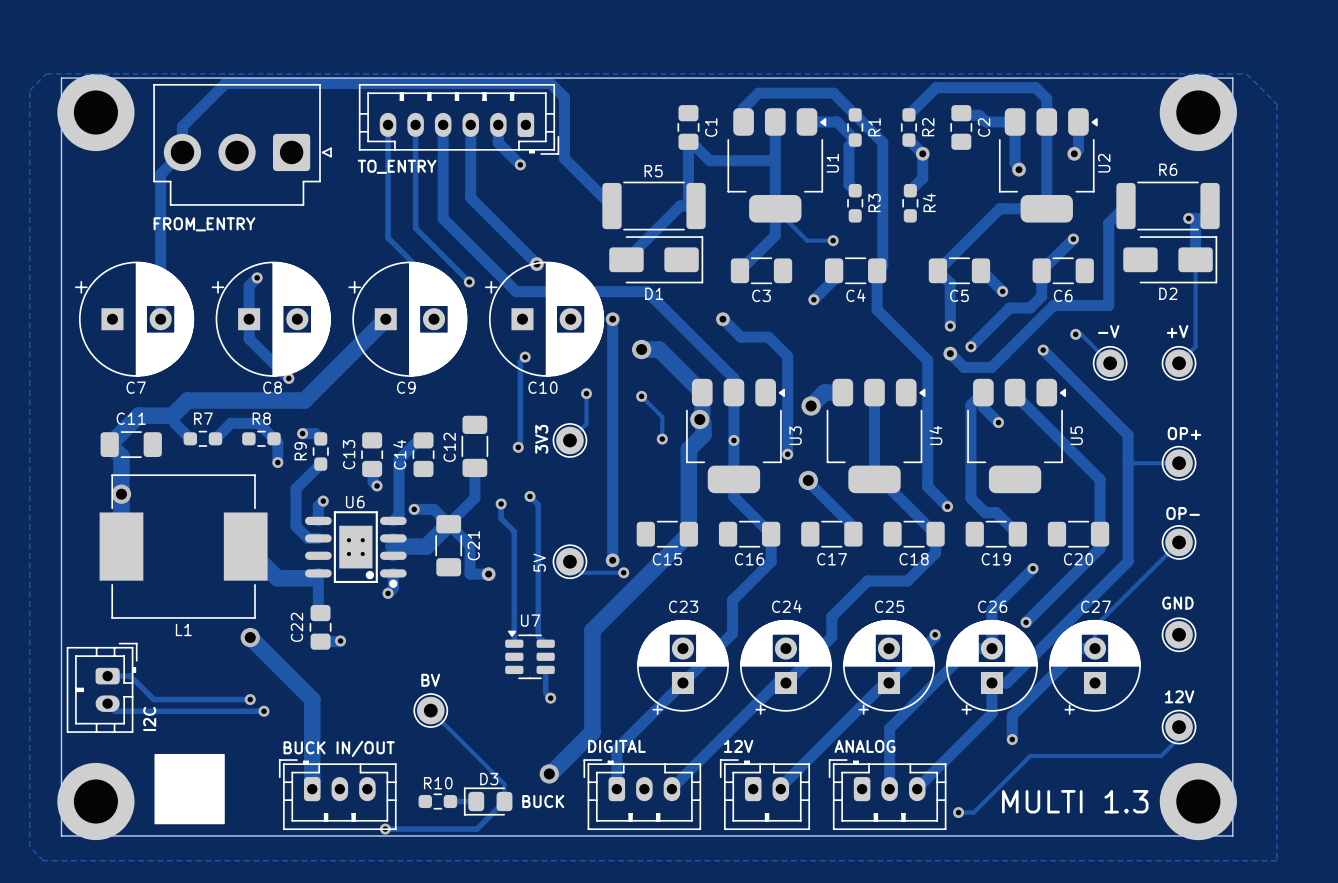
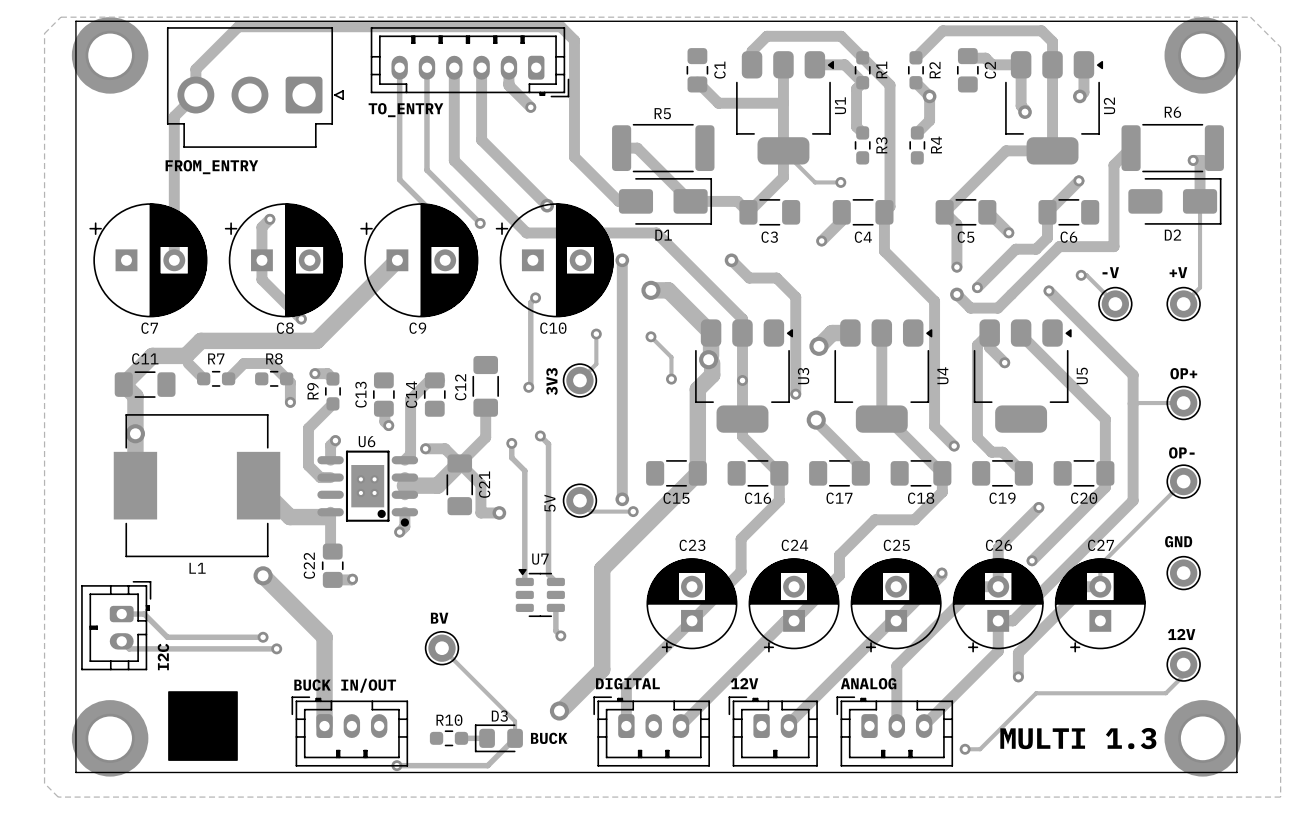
track: (688, 141) (688, 198) (696, 206) (680, 206) (626, 259) -> none
track: (564, 158) (611, 206) -> (574, 101) (574, 157) (618, 201) (635, 201)
track: none -> (621, 148) (637, 148) (690, 201) (737, 201) (748, 212)

